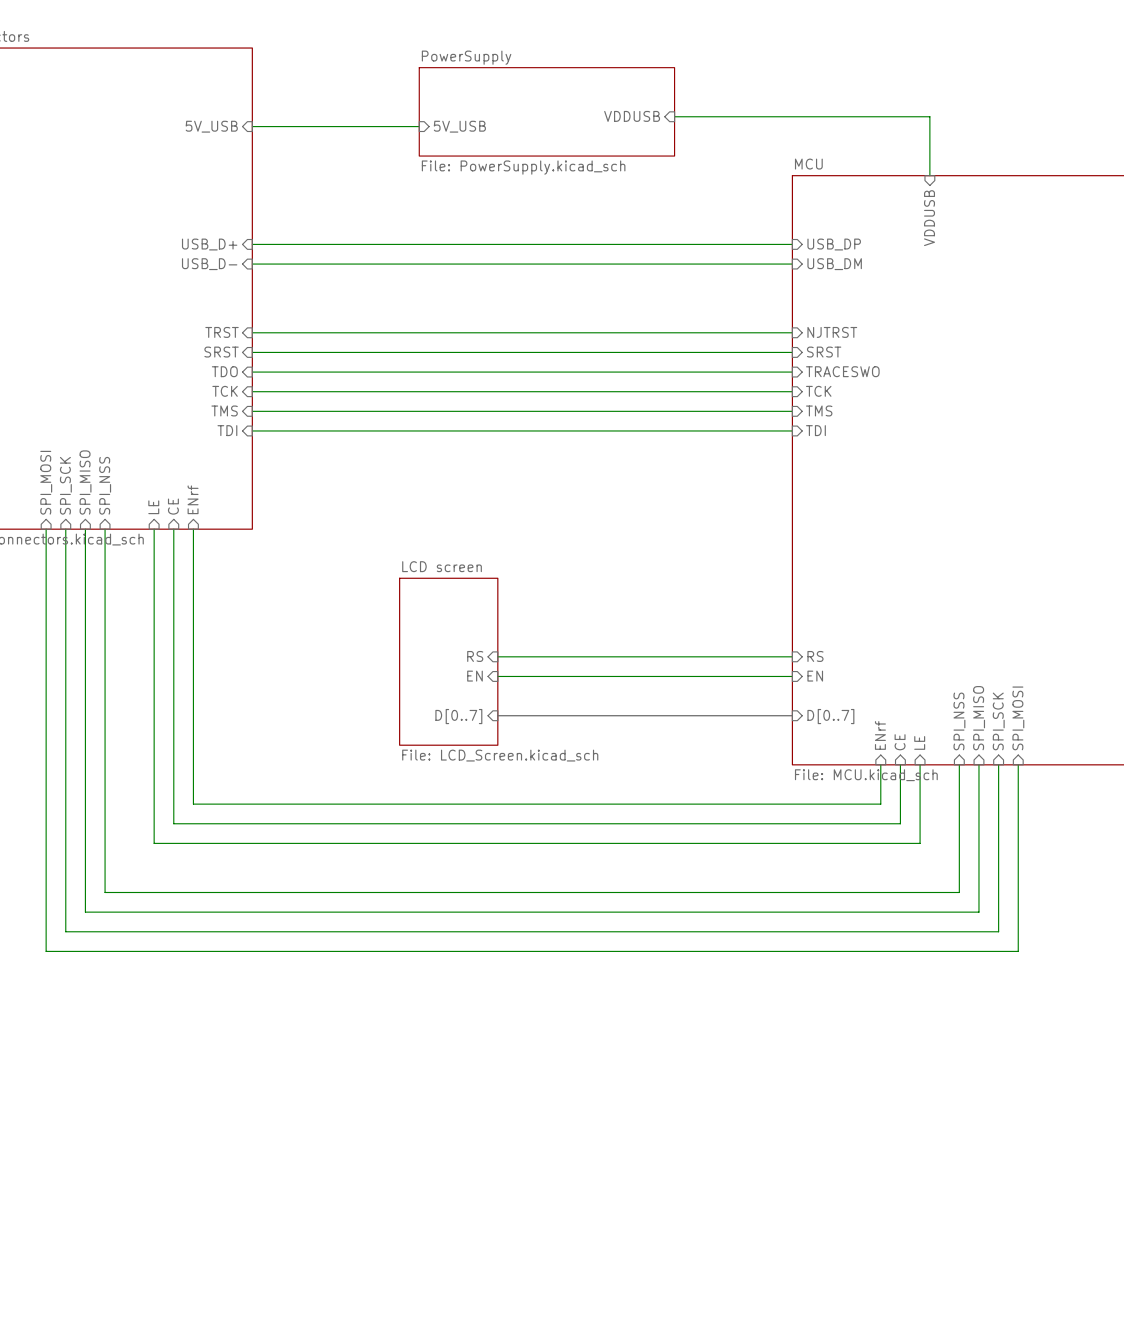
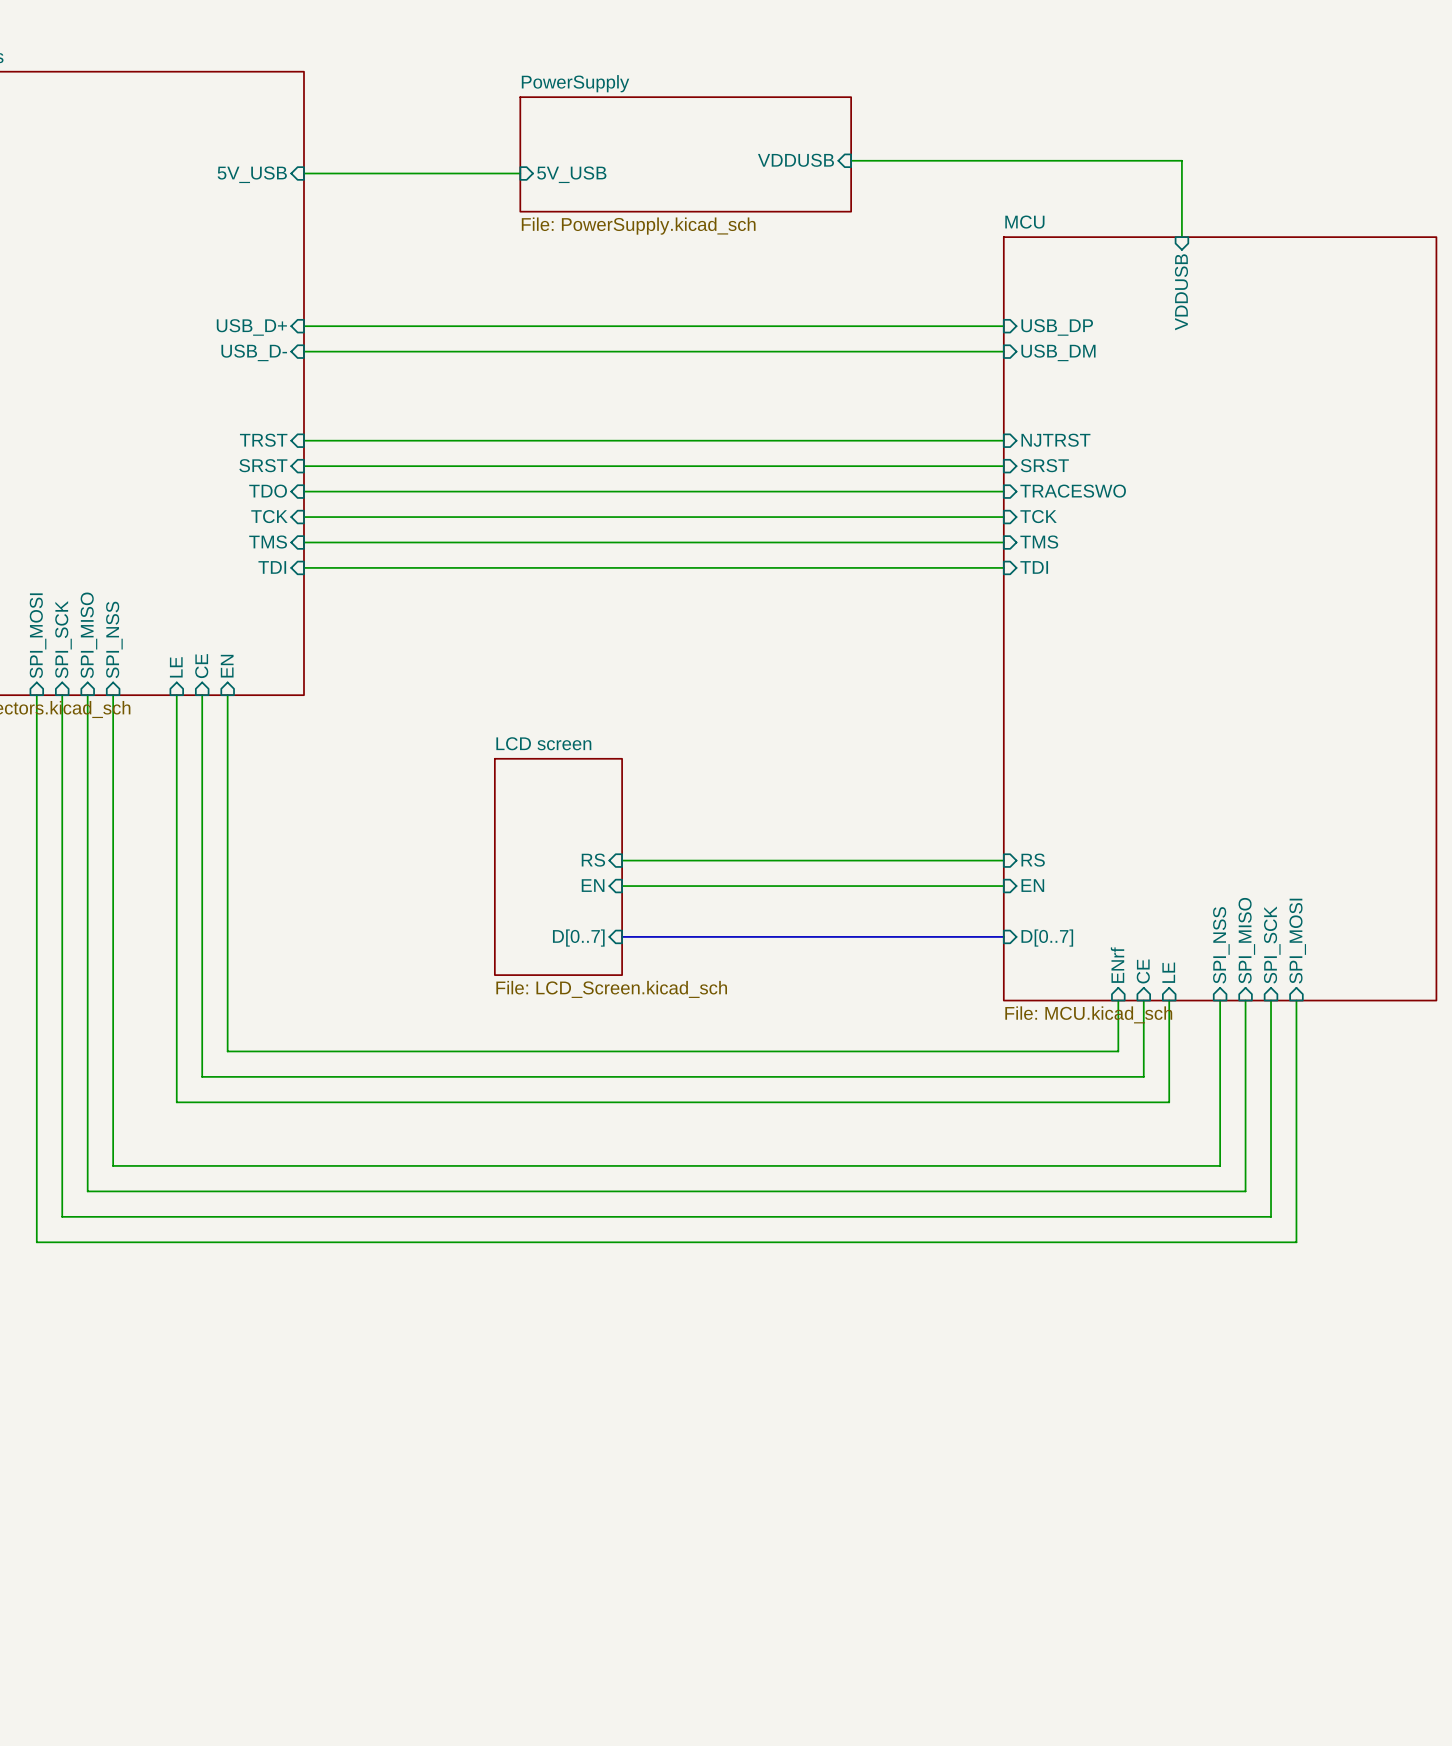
sheet pin: ENrf (193, 499) -> EN (227, 666)

